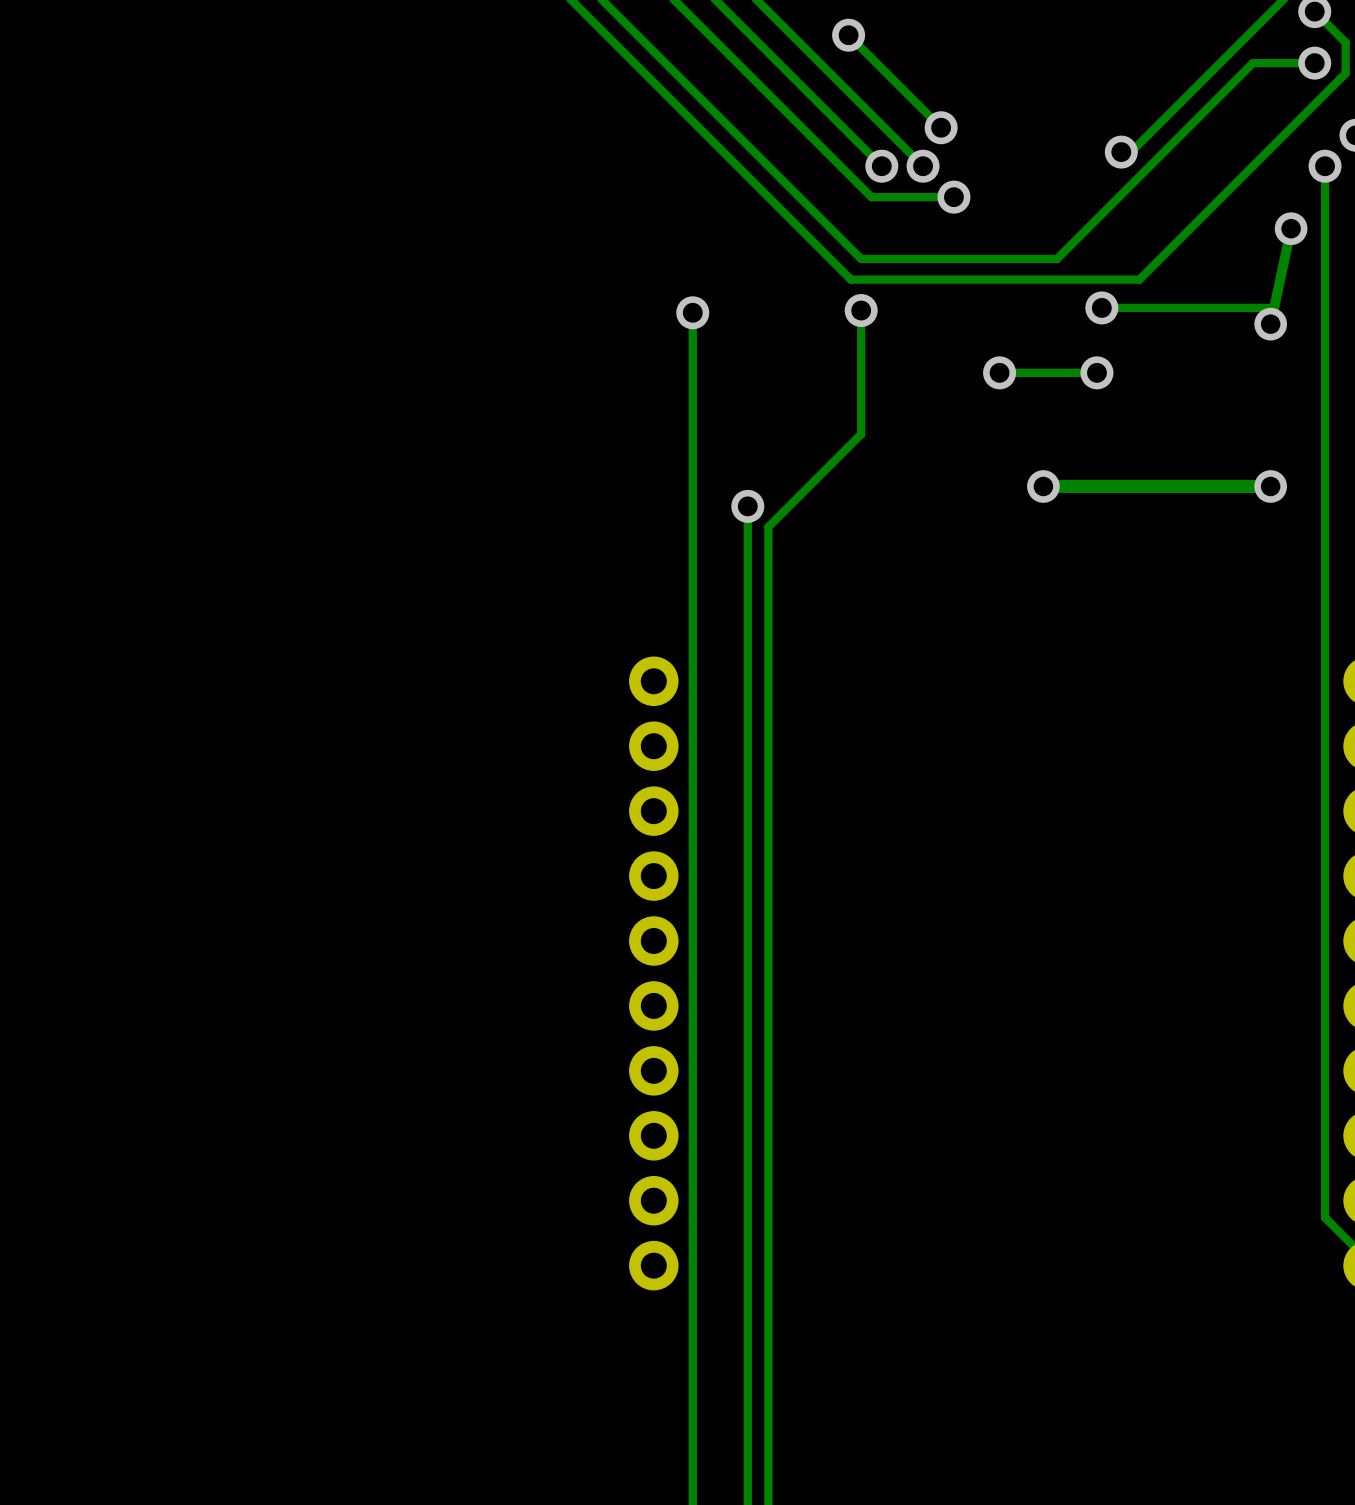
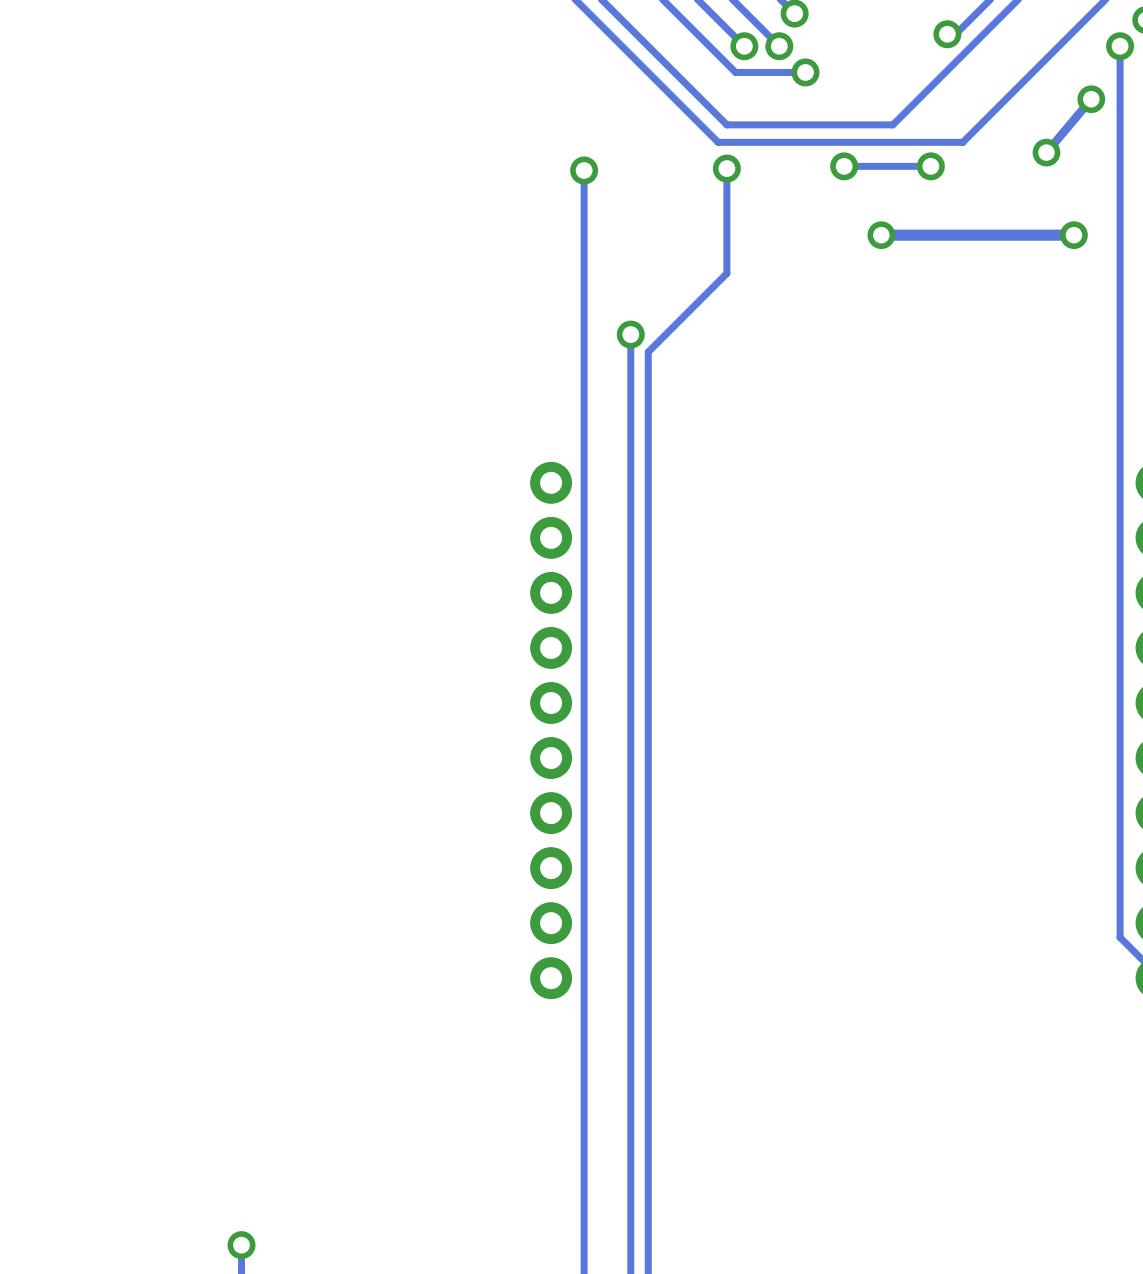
track: (1291, 228) (1270, 324) (1272, 307) (1101, 307) -> (1091, 99) (1046, 152)
via: none -> (1046, 152)
via: none -> (844, 166)
via: (1270, 324) -> none
via: (999, 372) -> none
track: (1096, 372) (999, 372) -> (926, 166) (844, 166)
via: (1096, 372) -> none
via: none -> (1073, 235)
via position: (1043, 486) -> (881, 235)
track: (1270, 486) (1043, 486) -> (1073, 235) (881, 235)
via: (1270, 486) -> none

